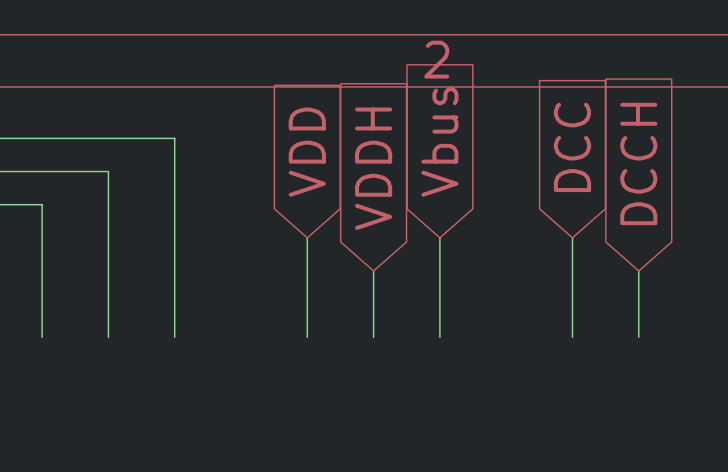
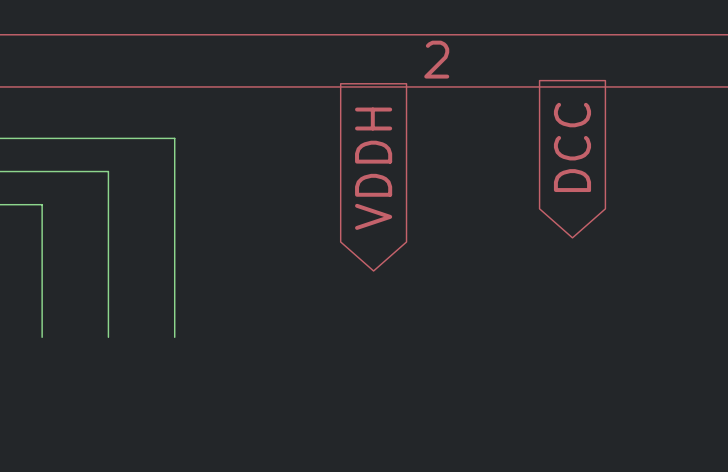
global label: Vbus (439, 141) -> none
global label: VDD (307, 152) -> none
global label: DCCH (638, 163) -> none
wire: (307, 237) (307, 337) -> none
wire: (439, 237) (439, 337) -> none
wire: (572, 237) (572, 337) -> none
wire: (373, 270) (373, 337) -> none
wire: (638, 270) (638, 337) -> none

